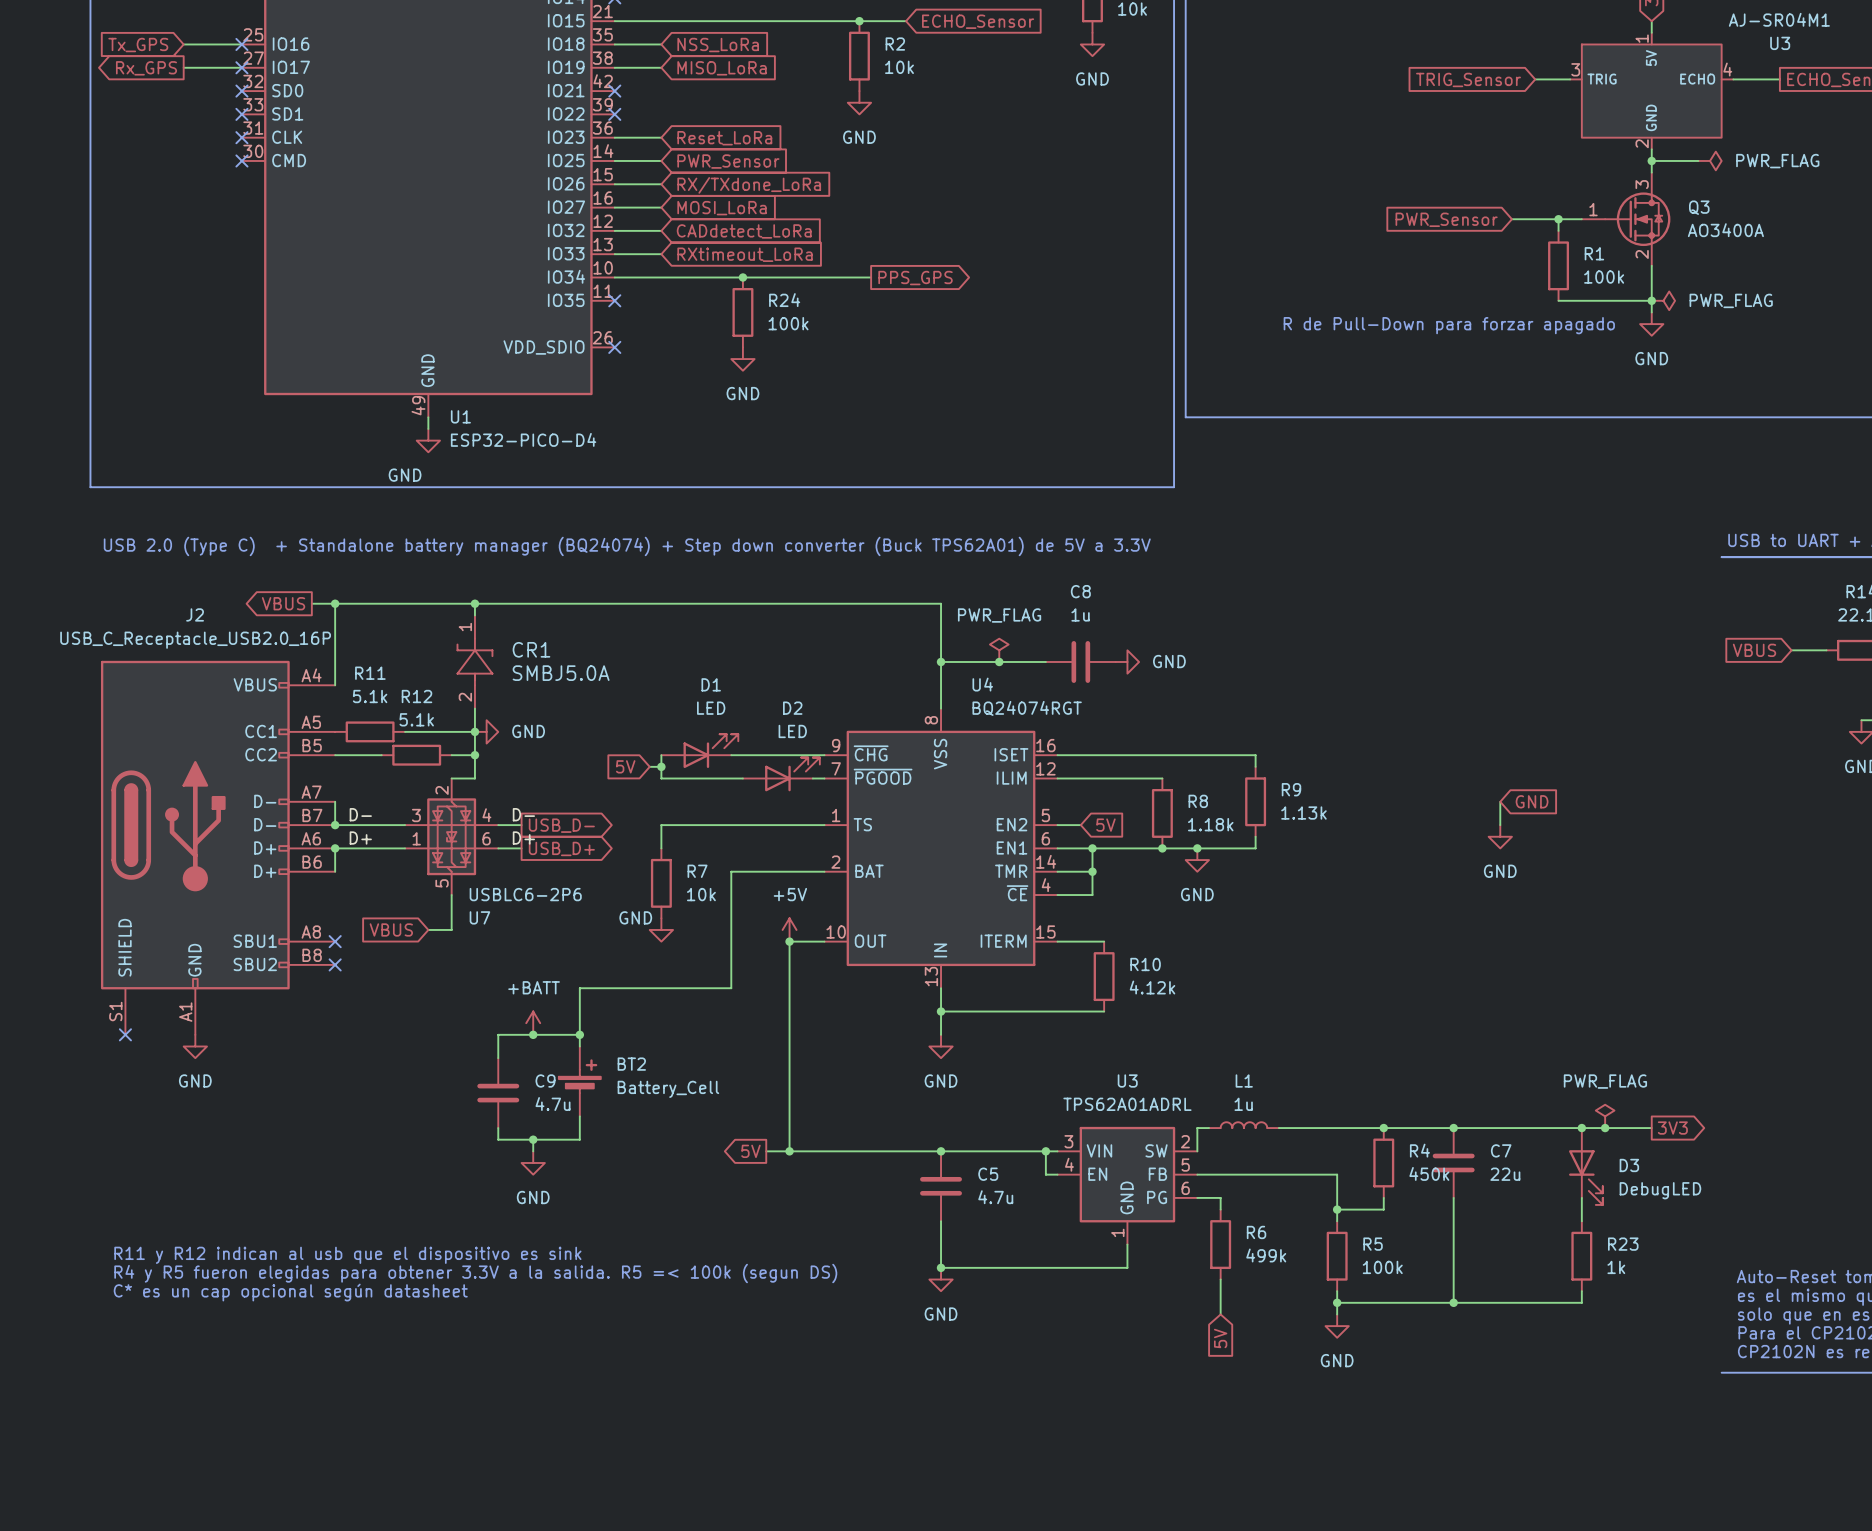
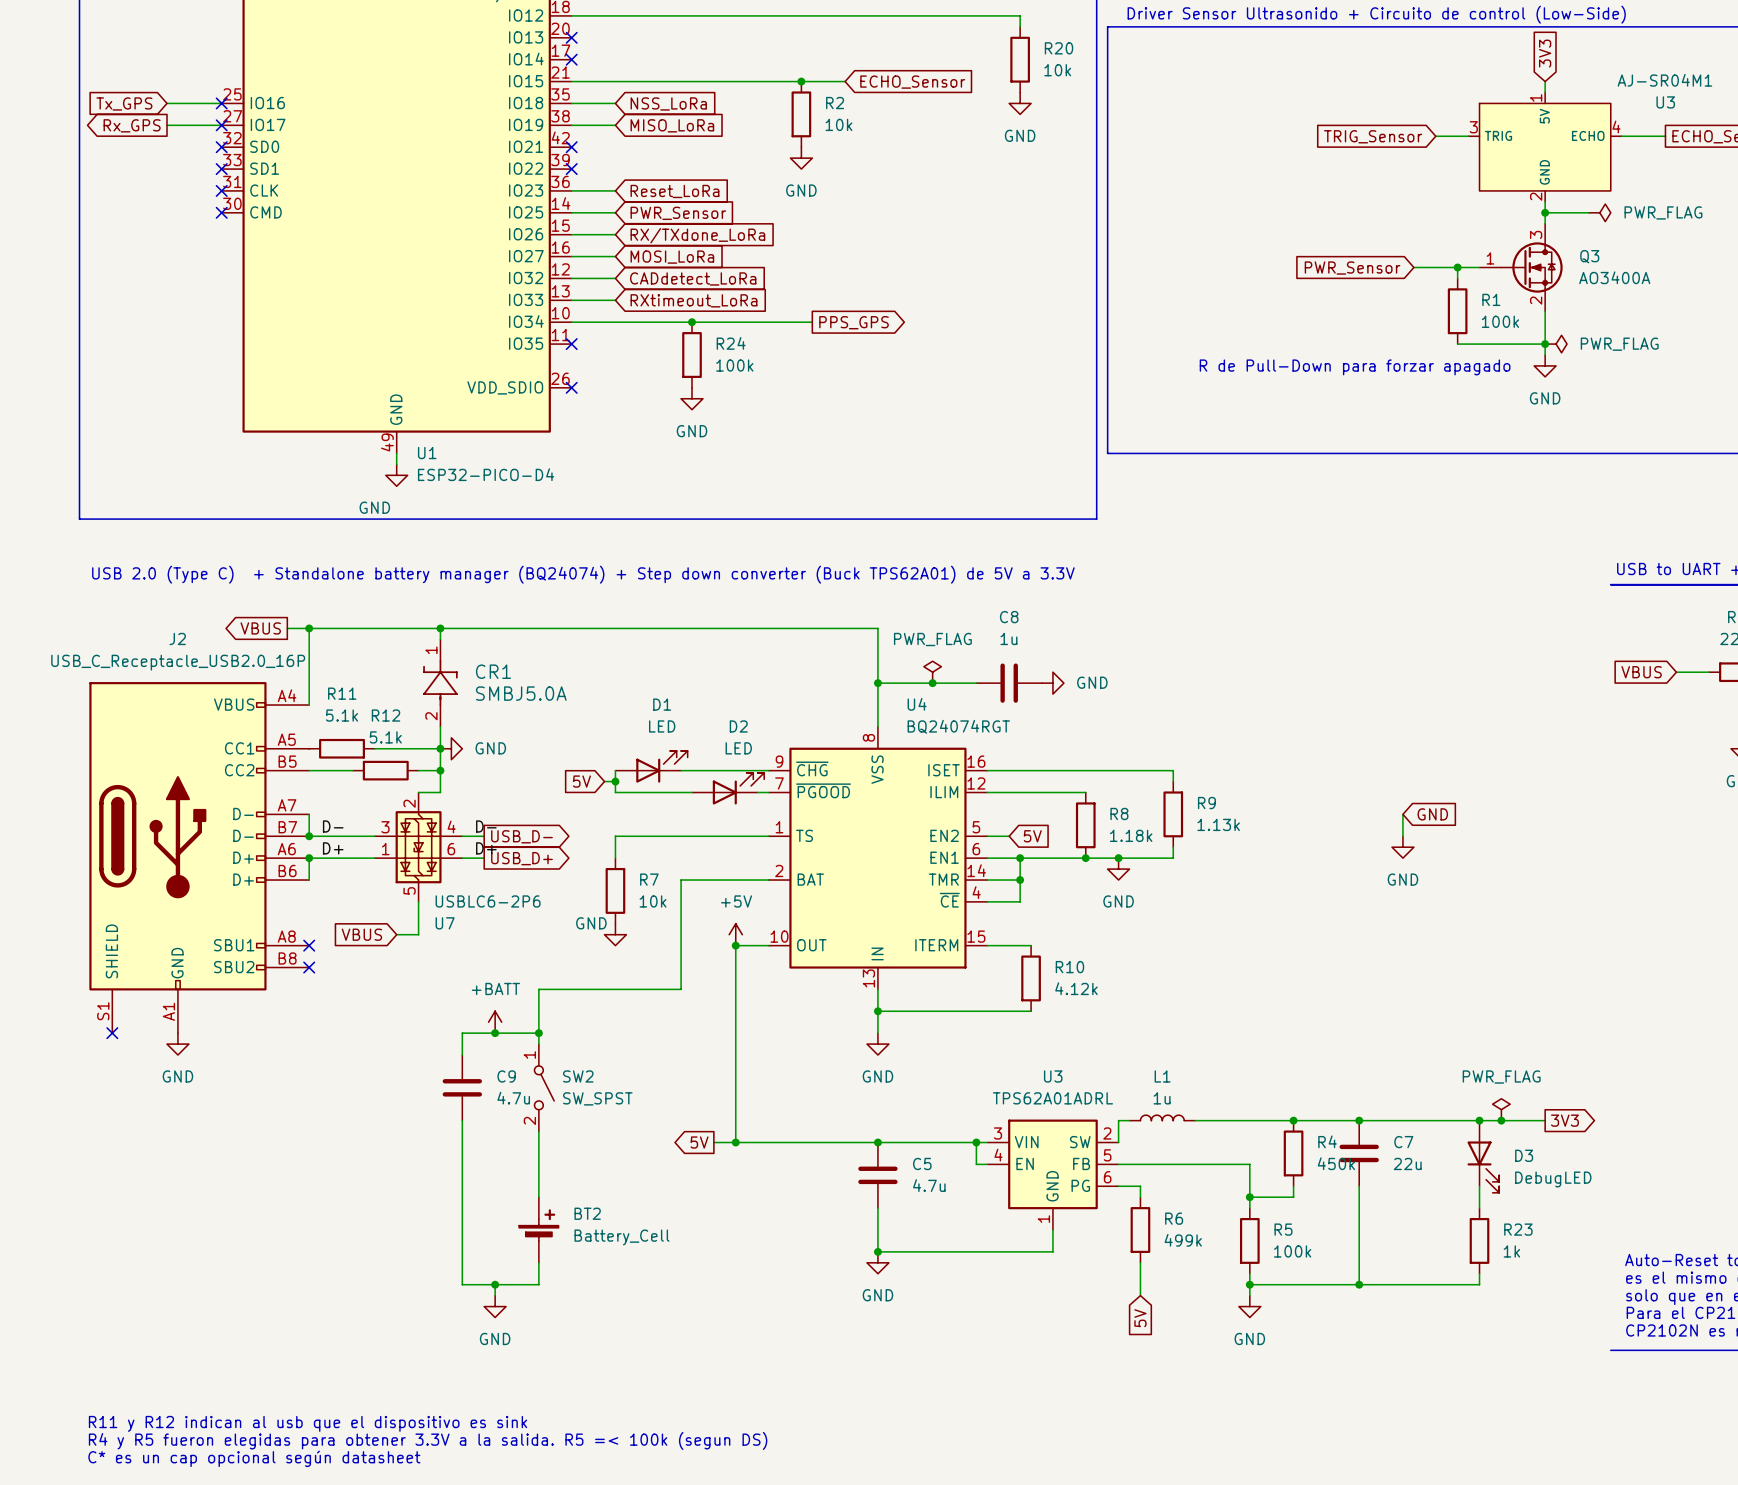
BT2 position: (579, 1081) -> (538, 1230)
SW2: none -> SW_SPST (544, 1087)
wire: (579, 1116) (579, 1139) (498, 1139) -> (538, 1262) (538, 1284) (462, 1284) (462, 1131)
wire: (533, 1139) (533, 1151) -> (495, 1284) (495, 1295)
junction: (533, 1139) -> none
wire: none -> (538, 1131) (538, 1197)
power symbol position: GND (533, 1162) -> GND (495, 1306)
text position: R11 y R12 indican al usb que el dispositivo es sink (347, 1255) -> R11 y R12 indican al usb que el dispositivo es sink (308, 1423)
text position: R4 y R5 fueron elegidas para obtener 3.3V a la salida. R5 =< 100k (segun DS) (475, 1273) -> R4 y R5 fueron elegidas para obtener 3.3V a la salida. R5 =< 100k (segun DS) (428, 1440)
text position: C* es un cap opcional según datasheet (290, 1292) -> C* es un cap opcional según datasheet (254, 1458)
junction: none -> (495, 1284)

